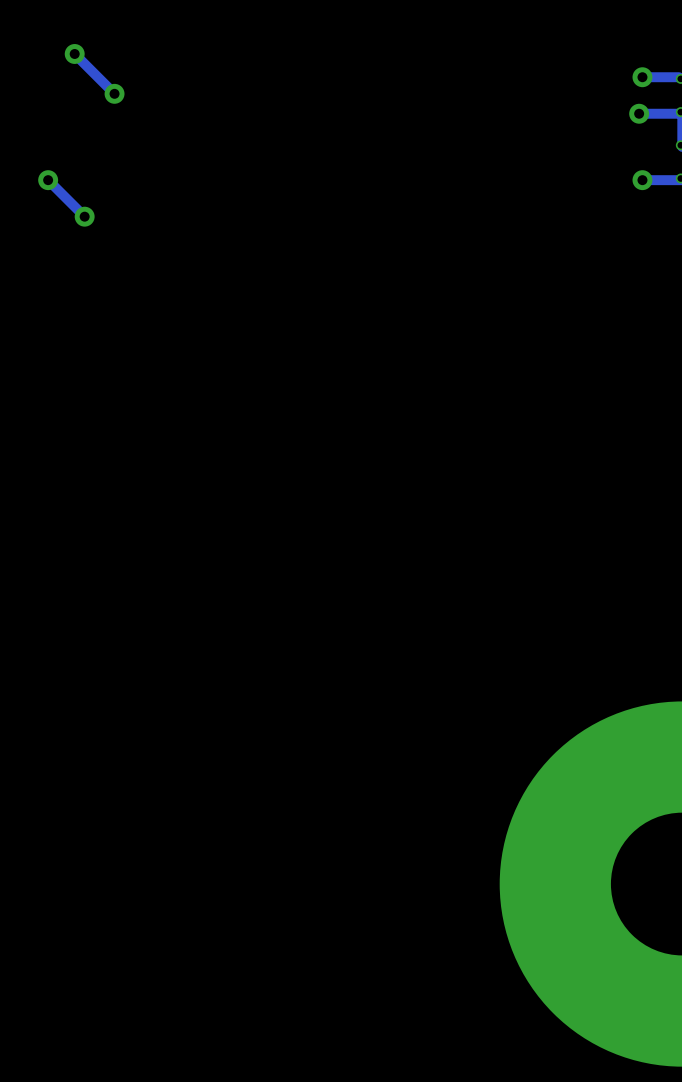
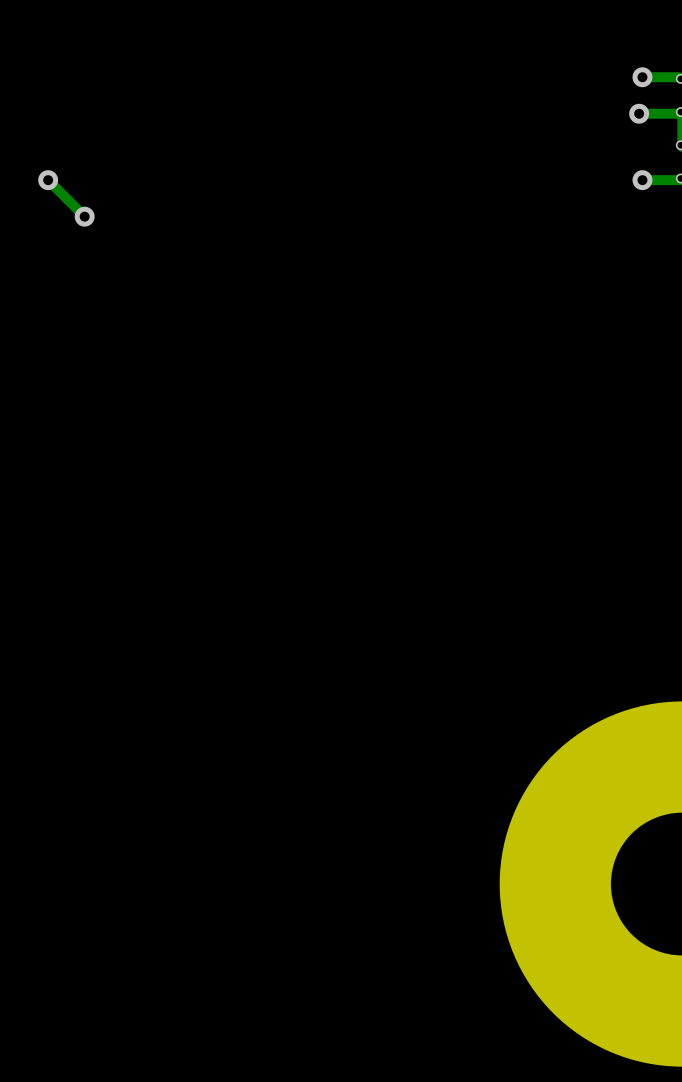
track: (74, 53) (114, 93) -> none
via: (74, 53) -> none
via: (114, 93) -> none

